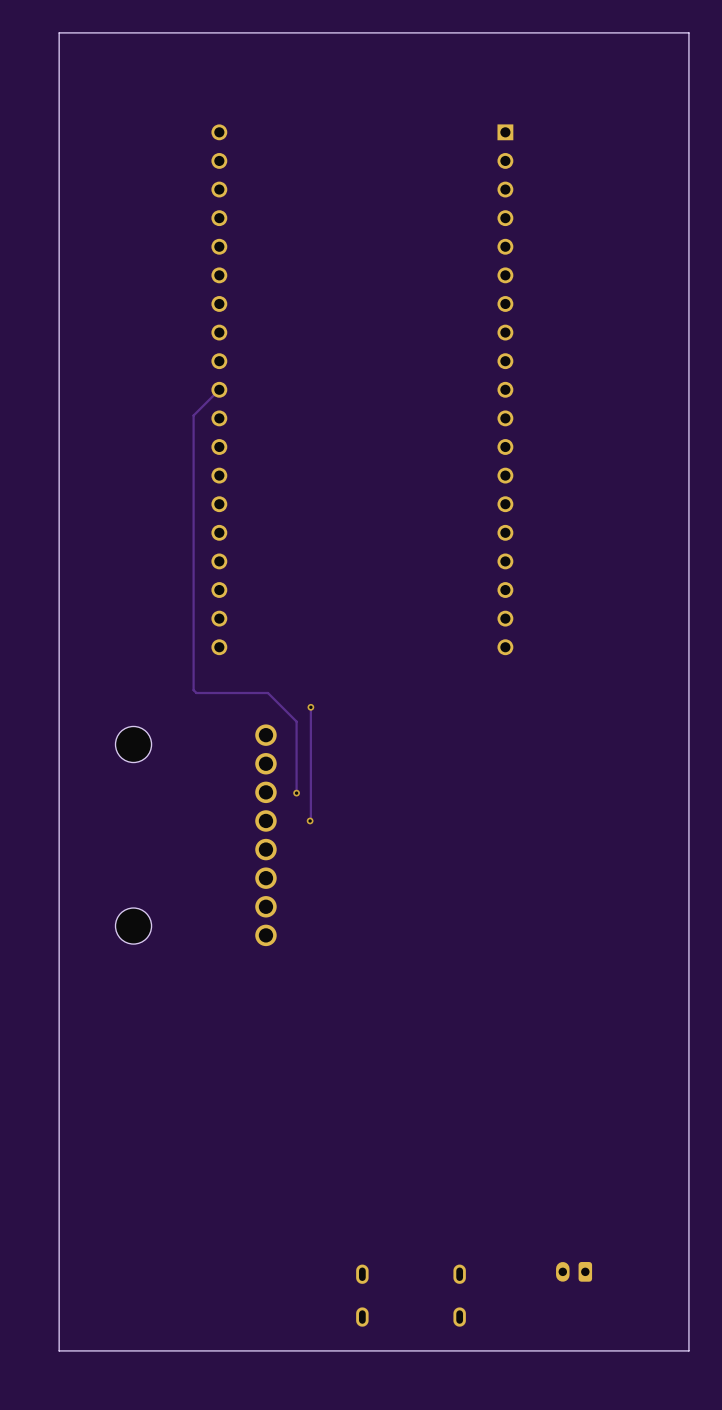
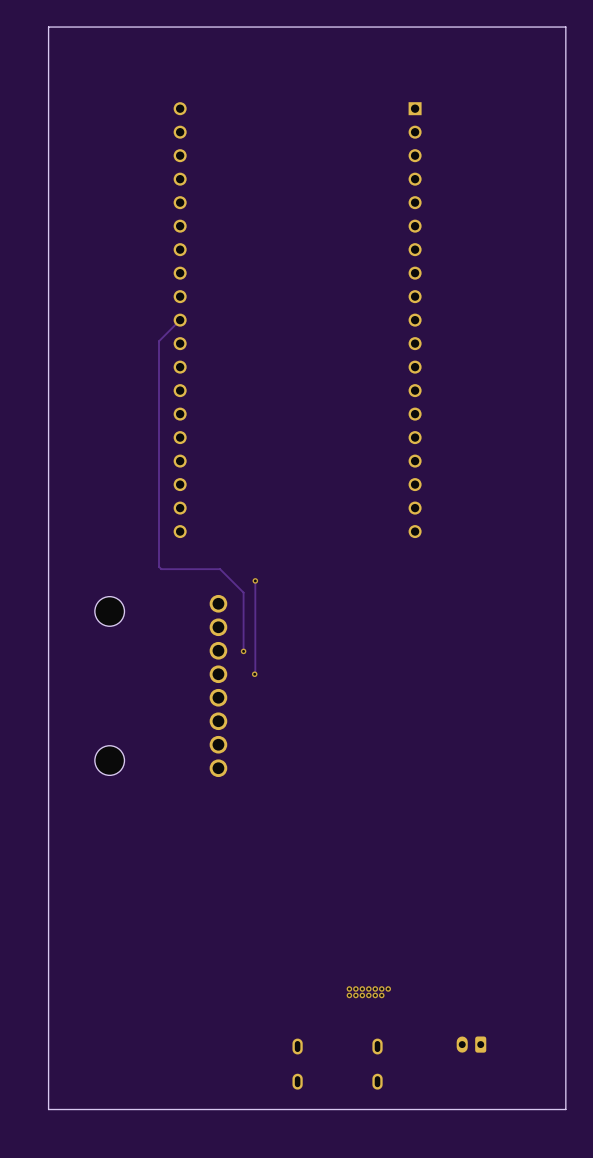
via: none -> (349, 988)
via: none -> (355, 988)
via: none -> (362, 988)
via: none -> (368, 988)
via: none -> (375, 988)
via: none -> (381, 988)
via: none -> (388, 988)
via: none -> (349, 995)
via: none -> (355, 995)
via: none -> (362, 995)
via: none -> (368, 995)
via: none -> (375, 995)
via: none -> (381, 995)

